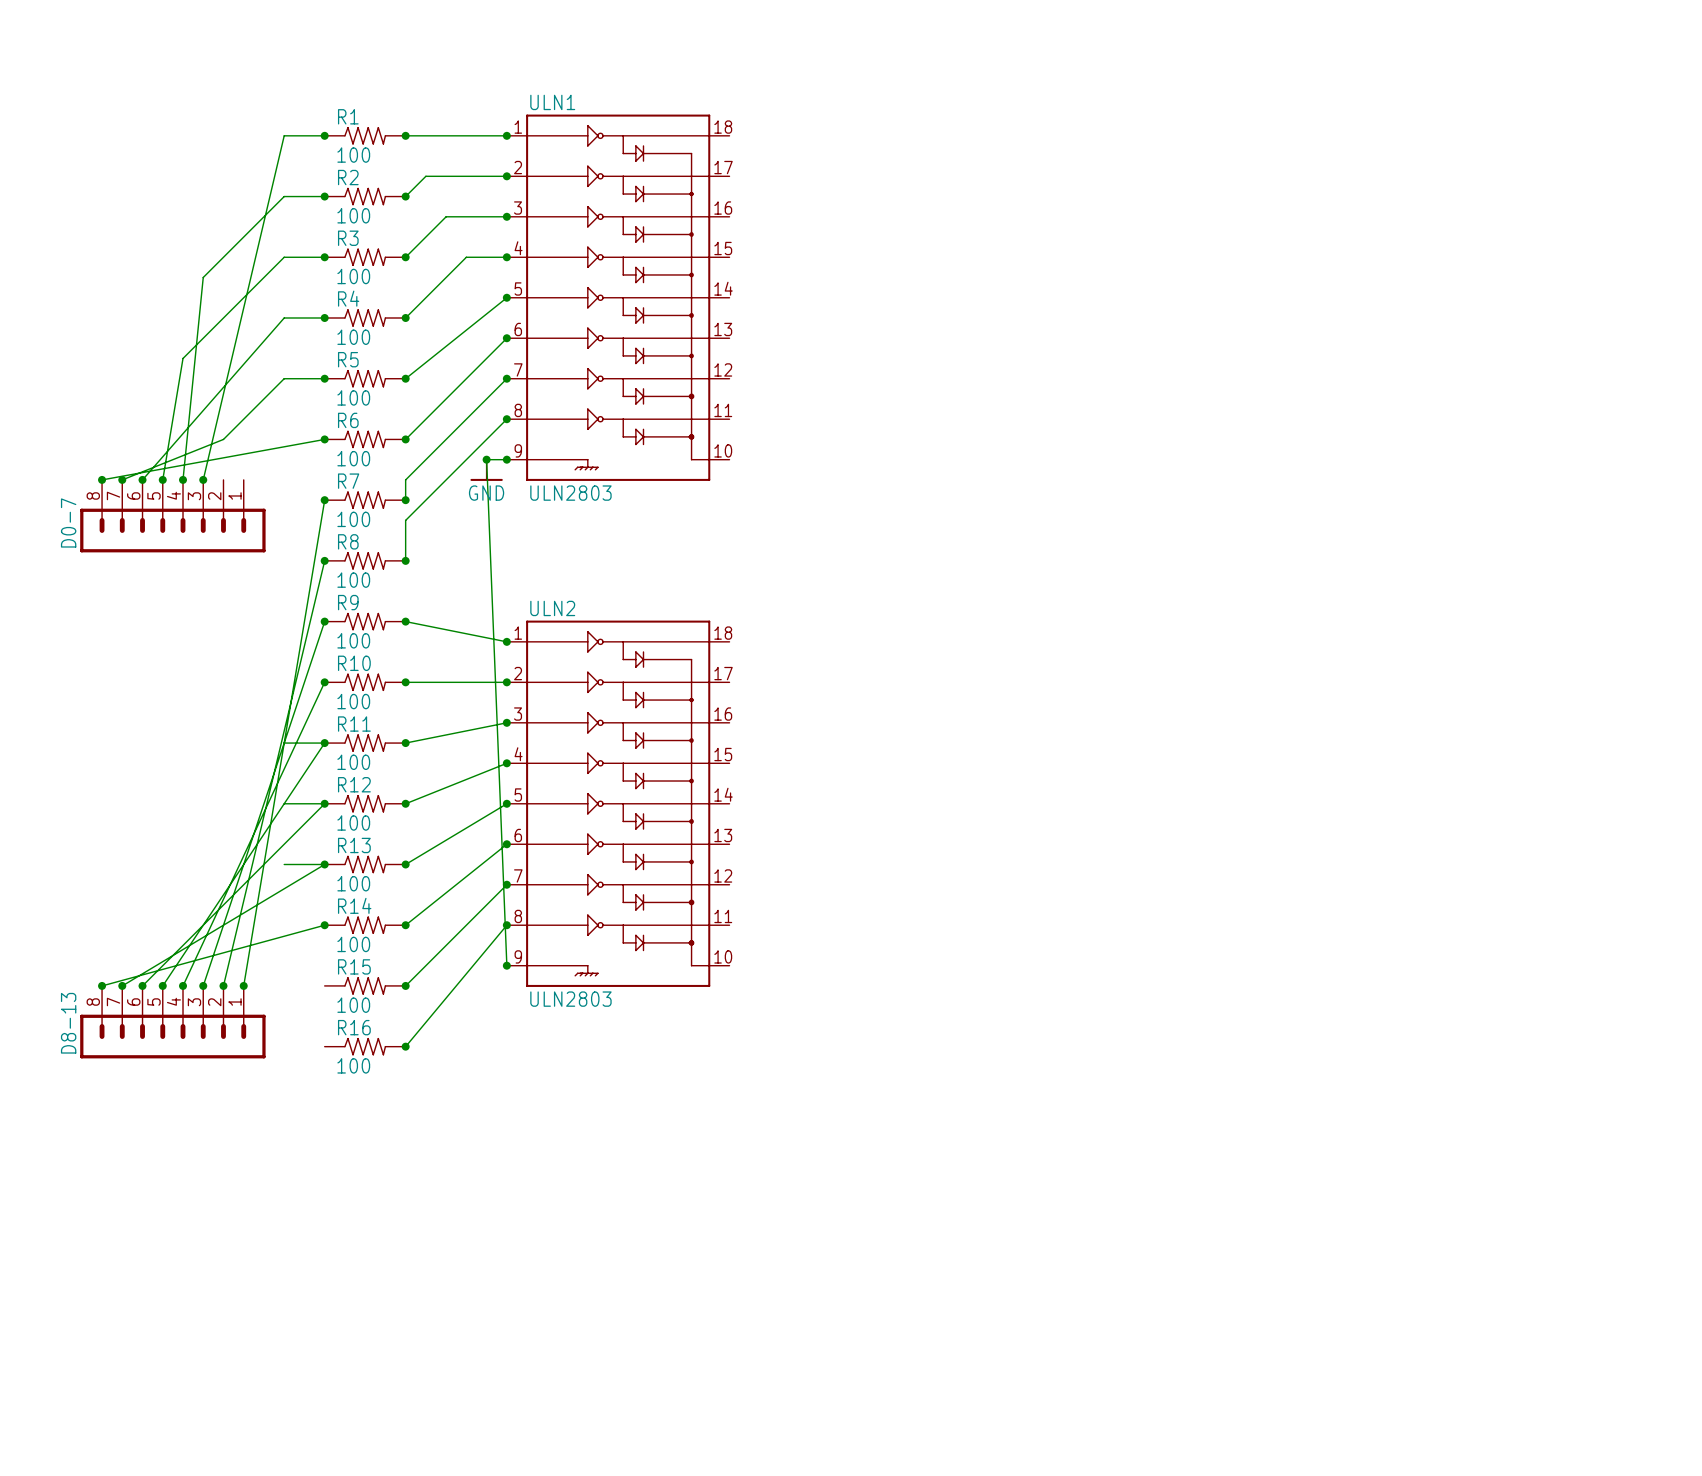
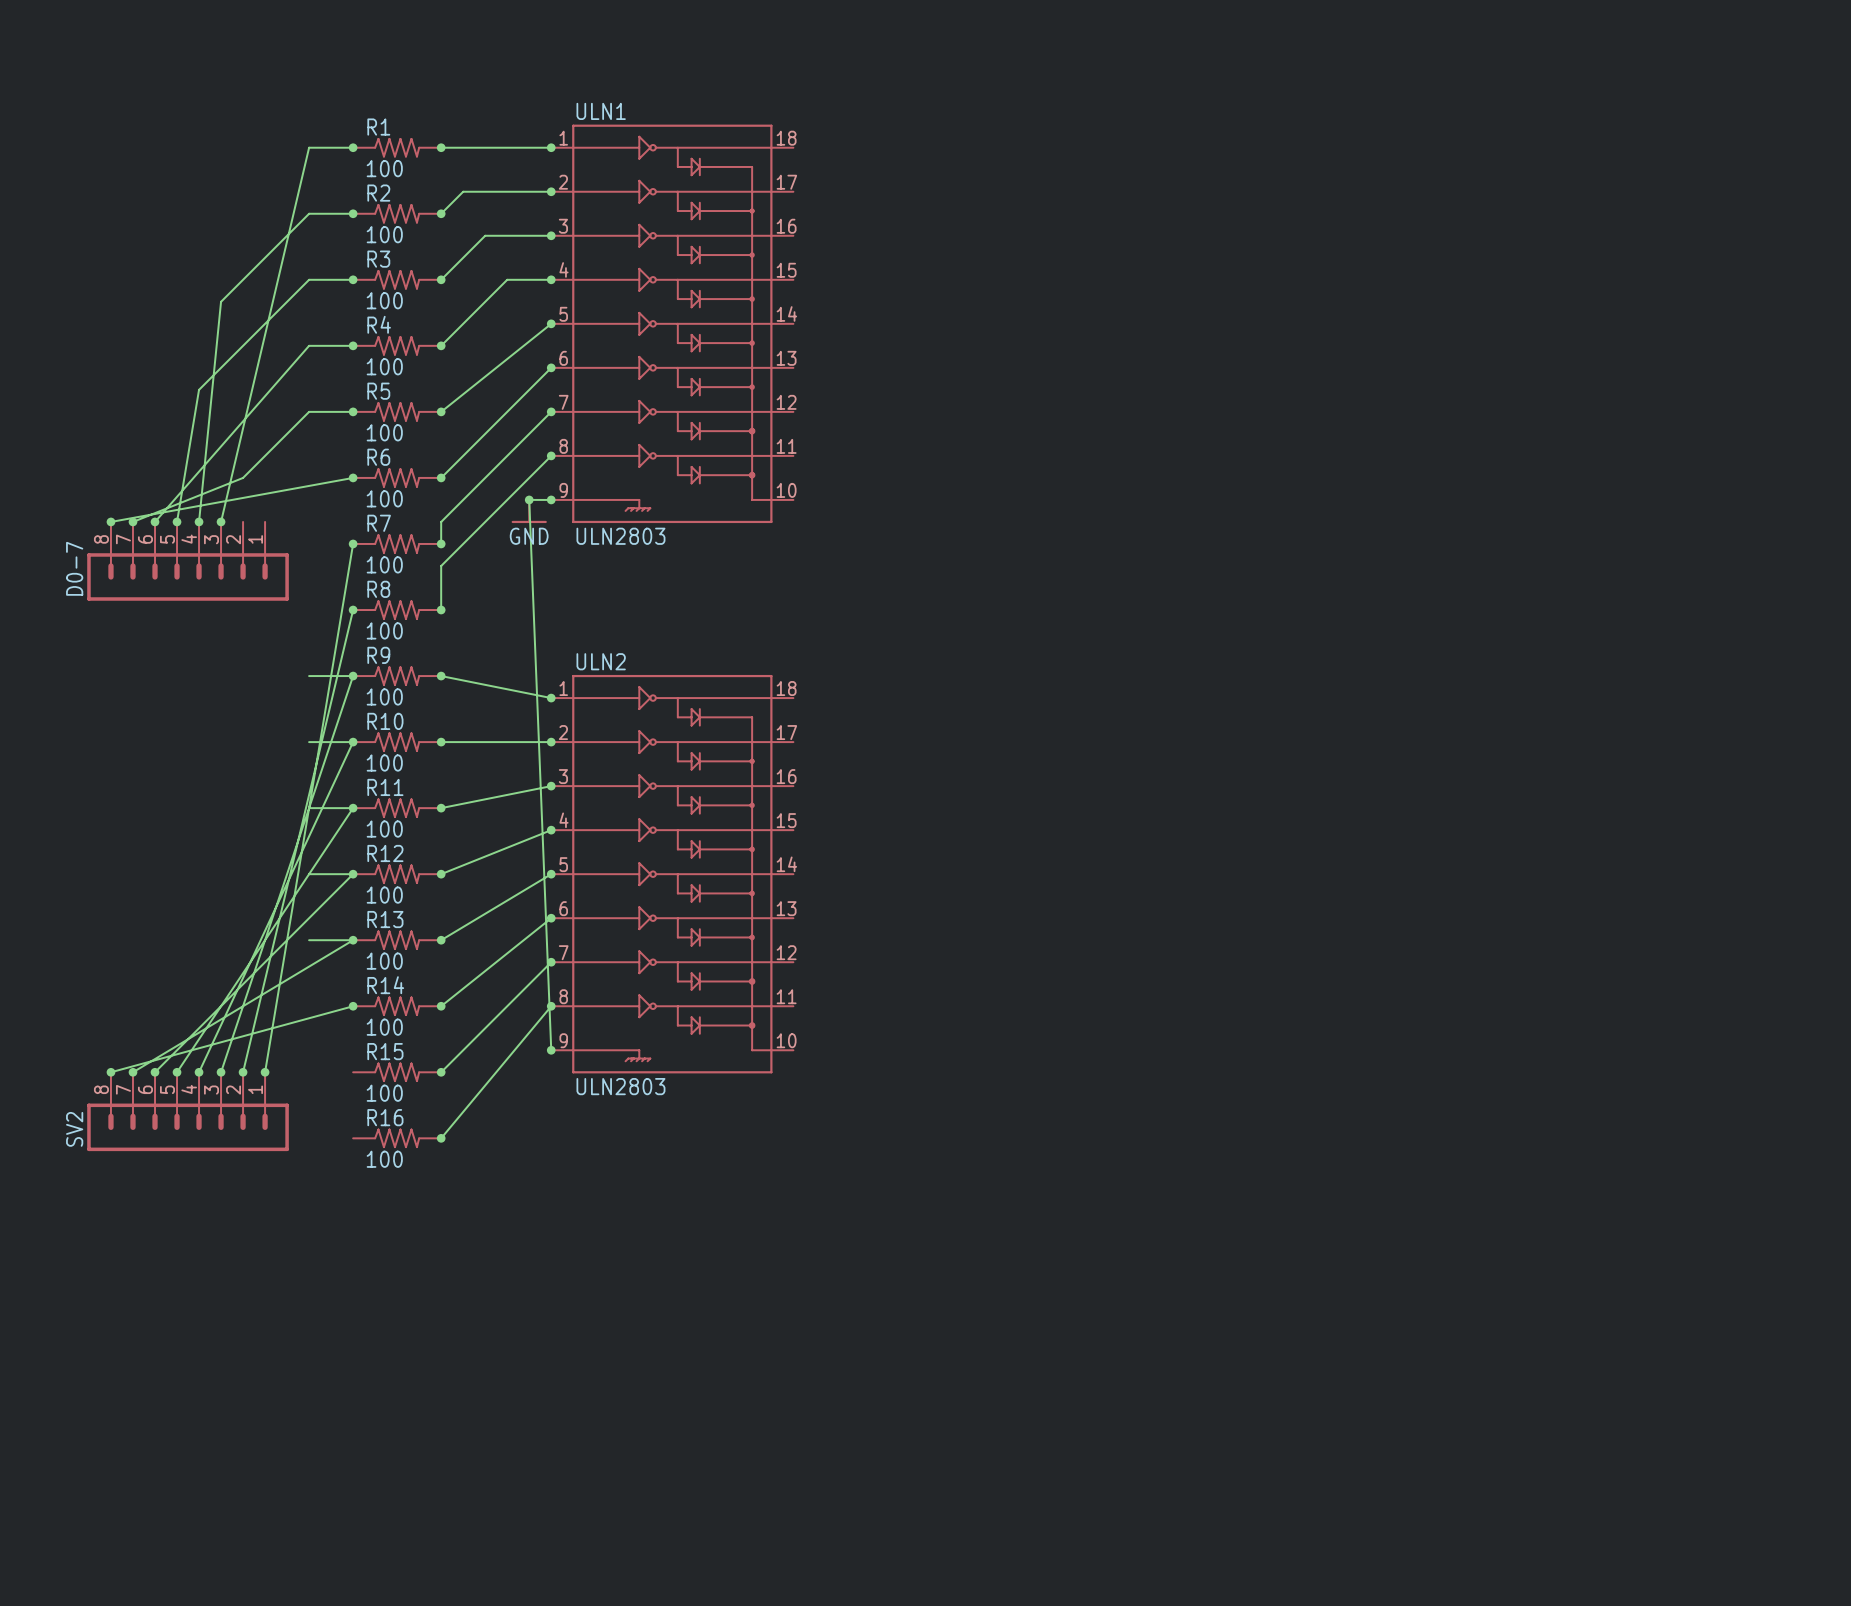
wire: none -> (309, 676) (353, 676)
wire: none -> (309, 742) (353, 742)
D8-13 name: D8-13 (68, 1023) -> SV2 (74, 1129)

